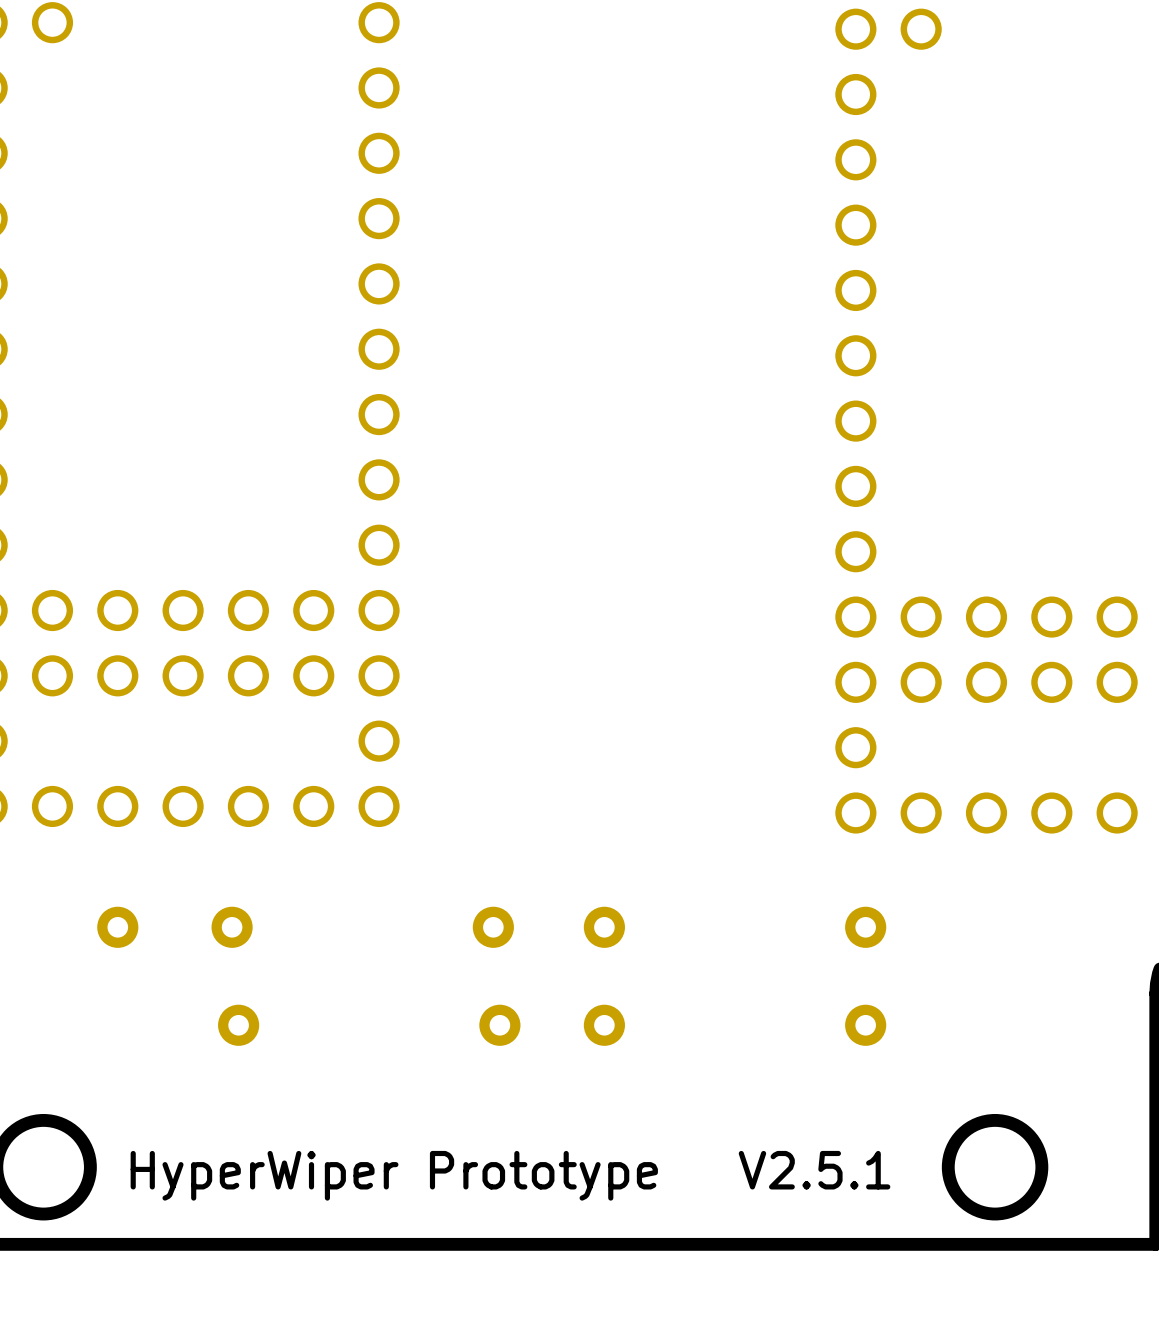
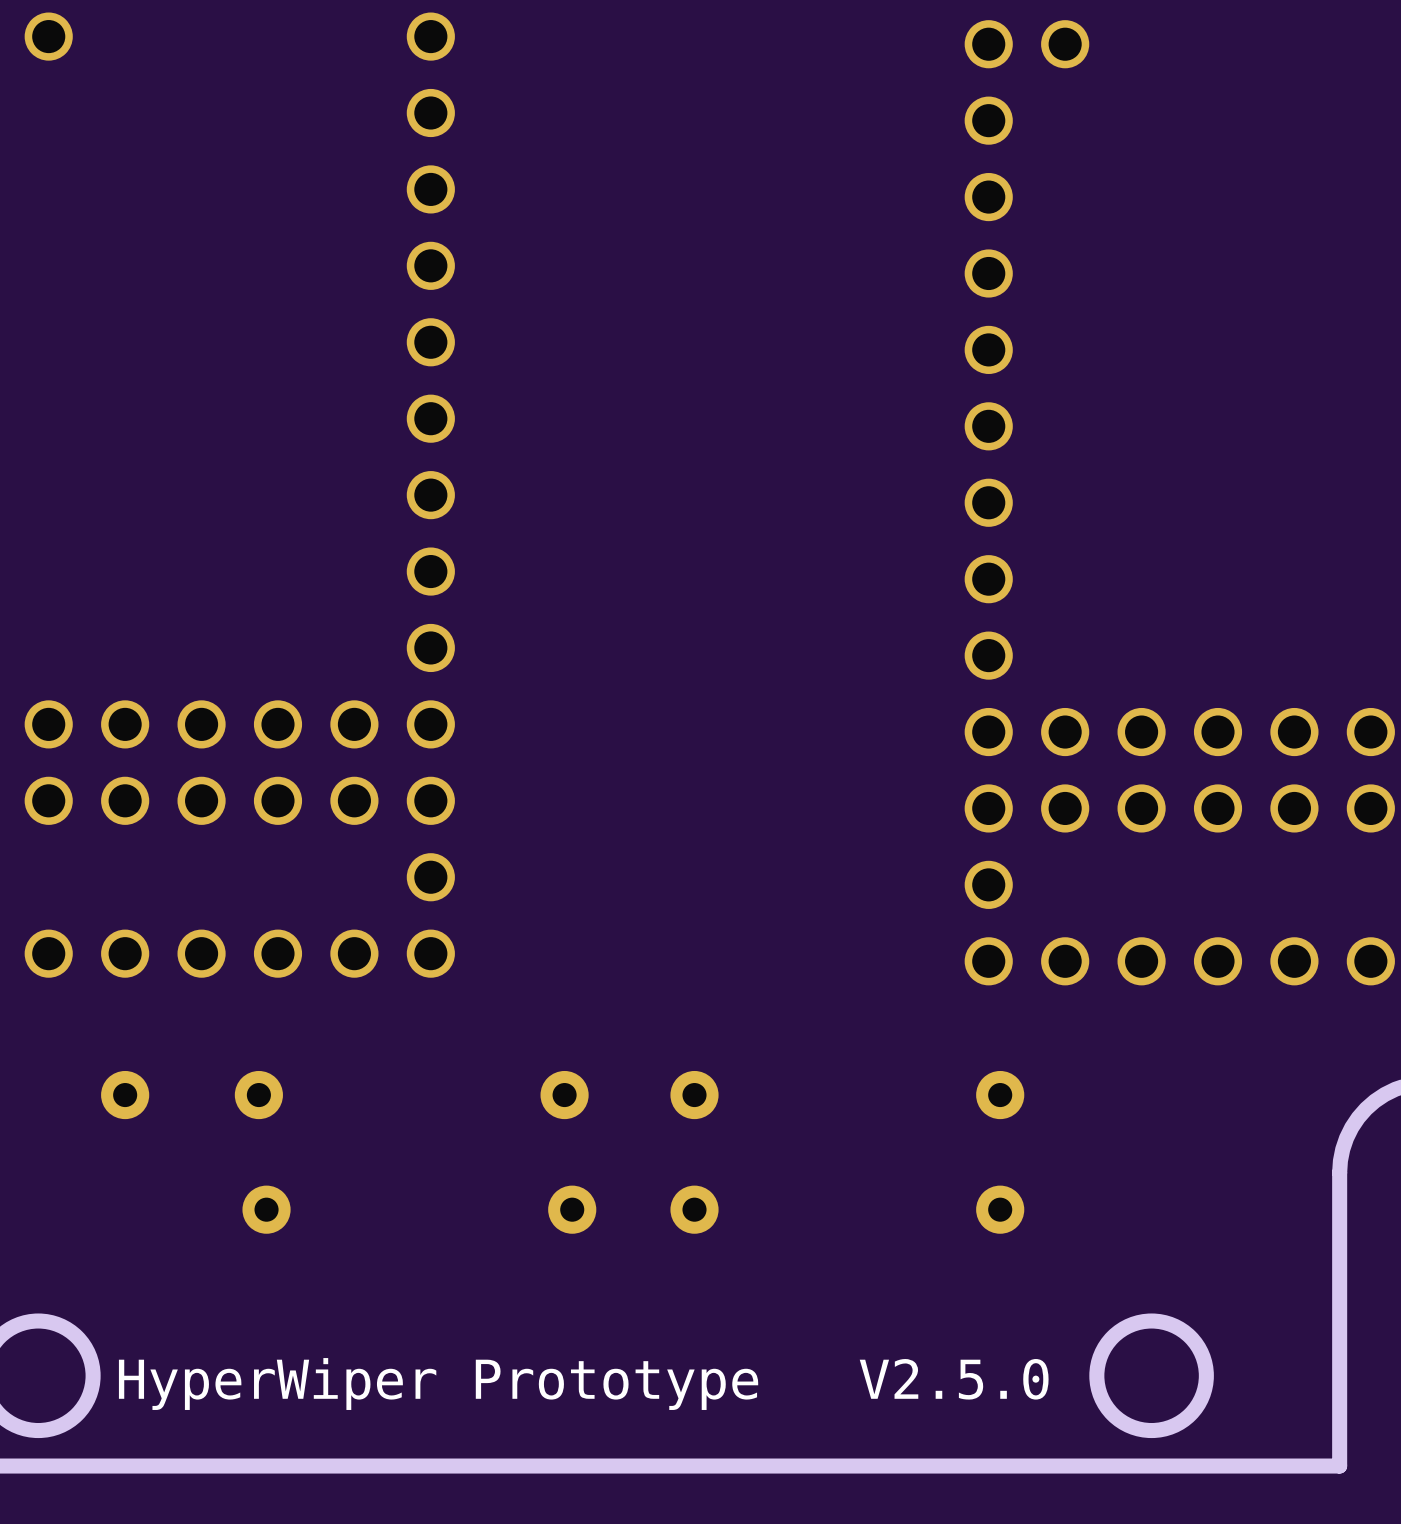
text: HyperWiper Prototype V2.5.1 (510, 1175) -> HyperWiper Prototype V2.5.0 (583, 1384)

